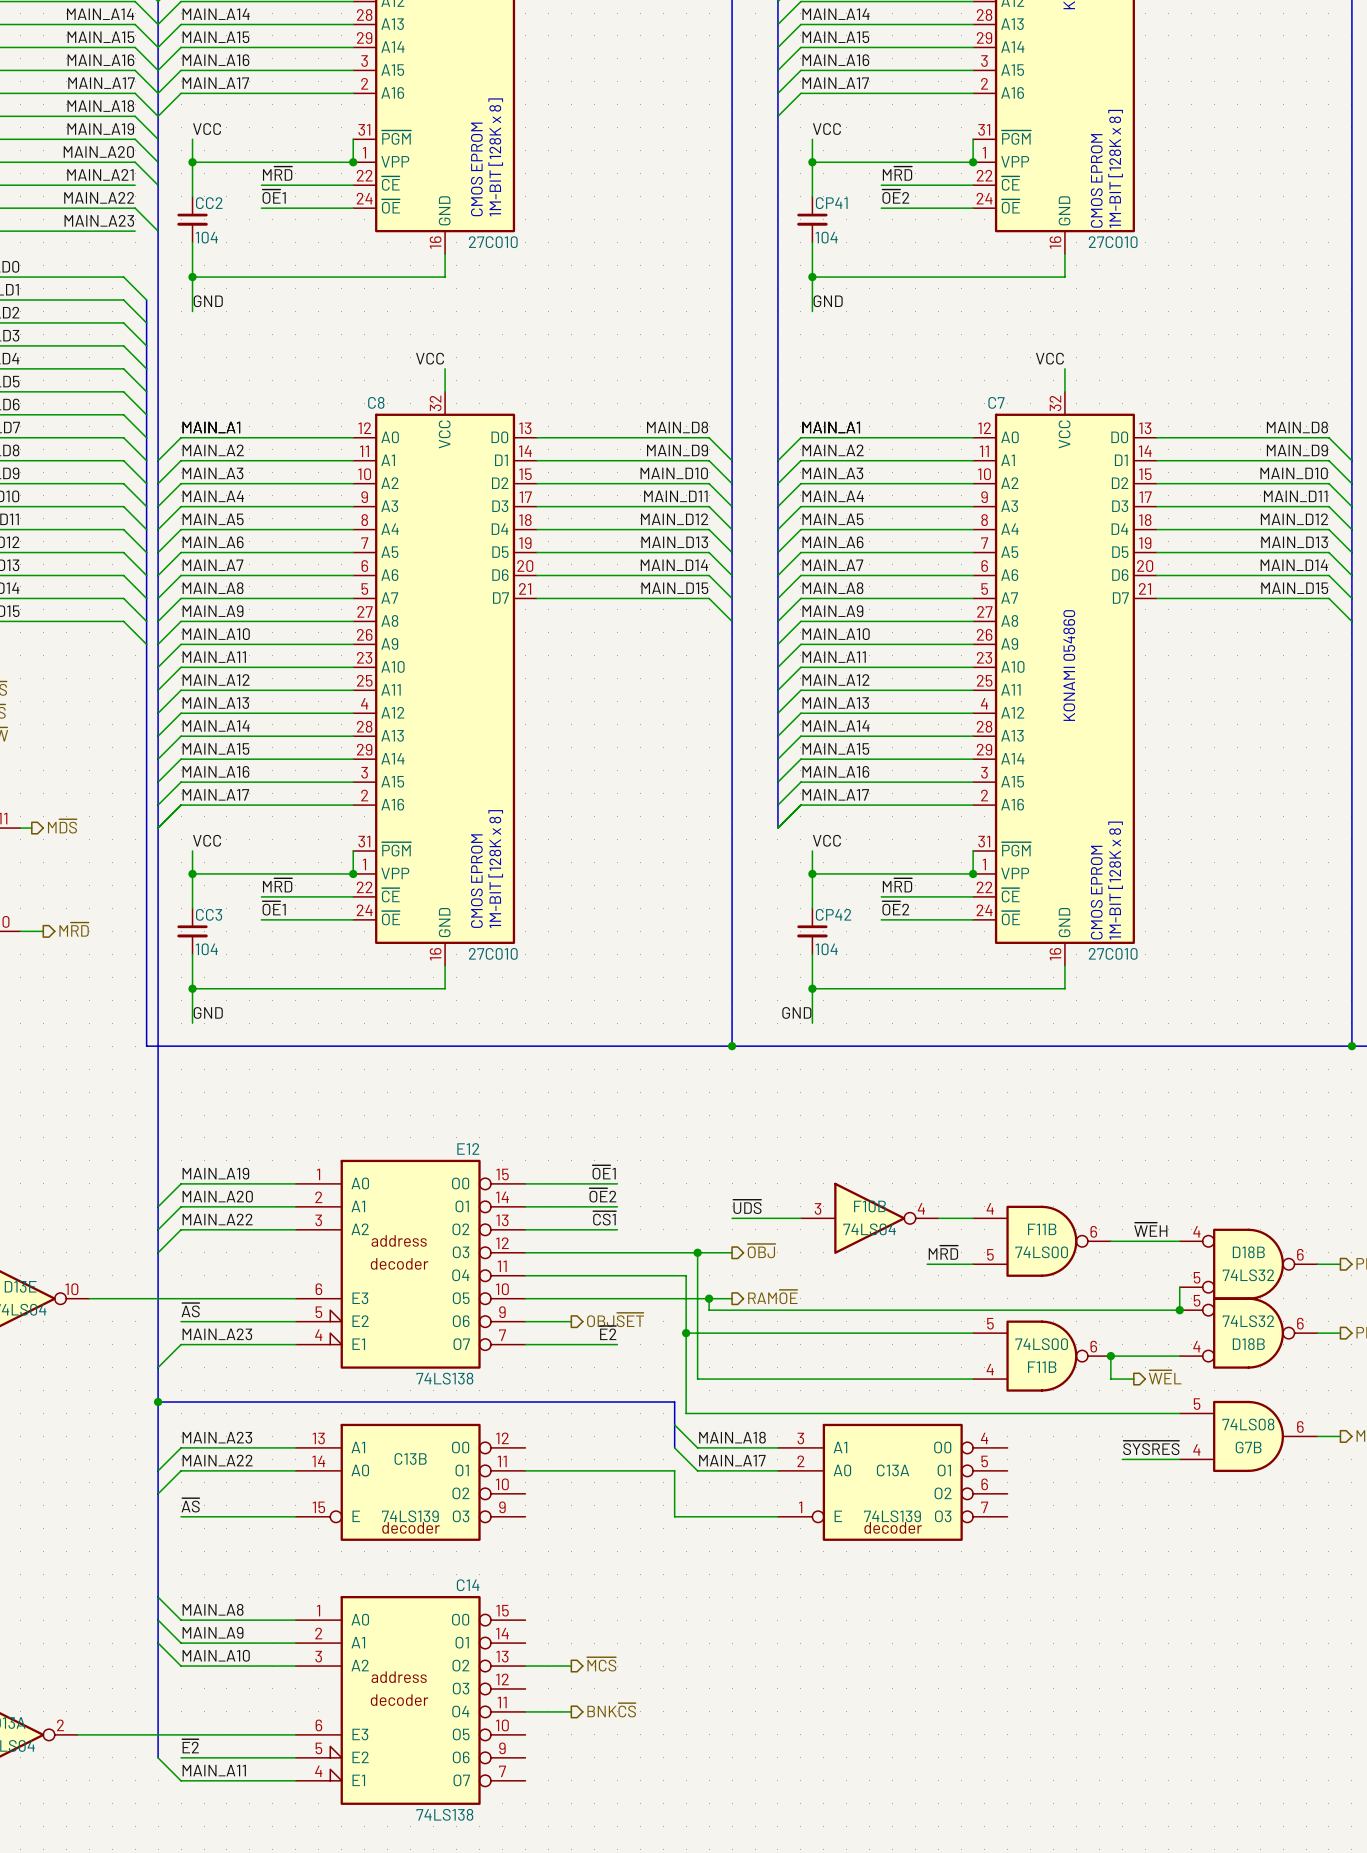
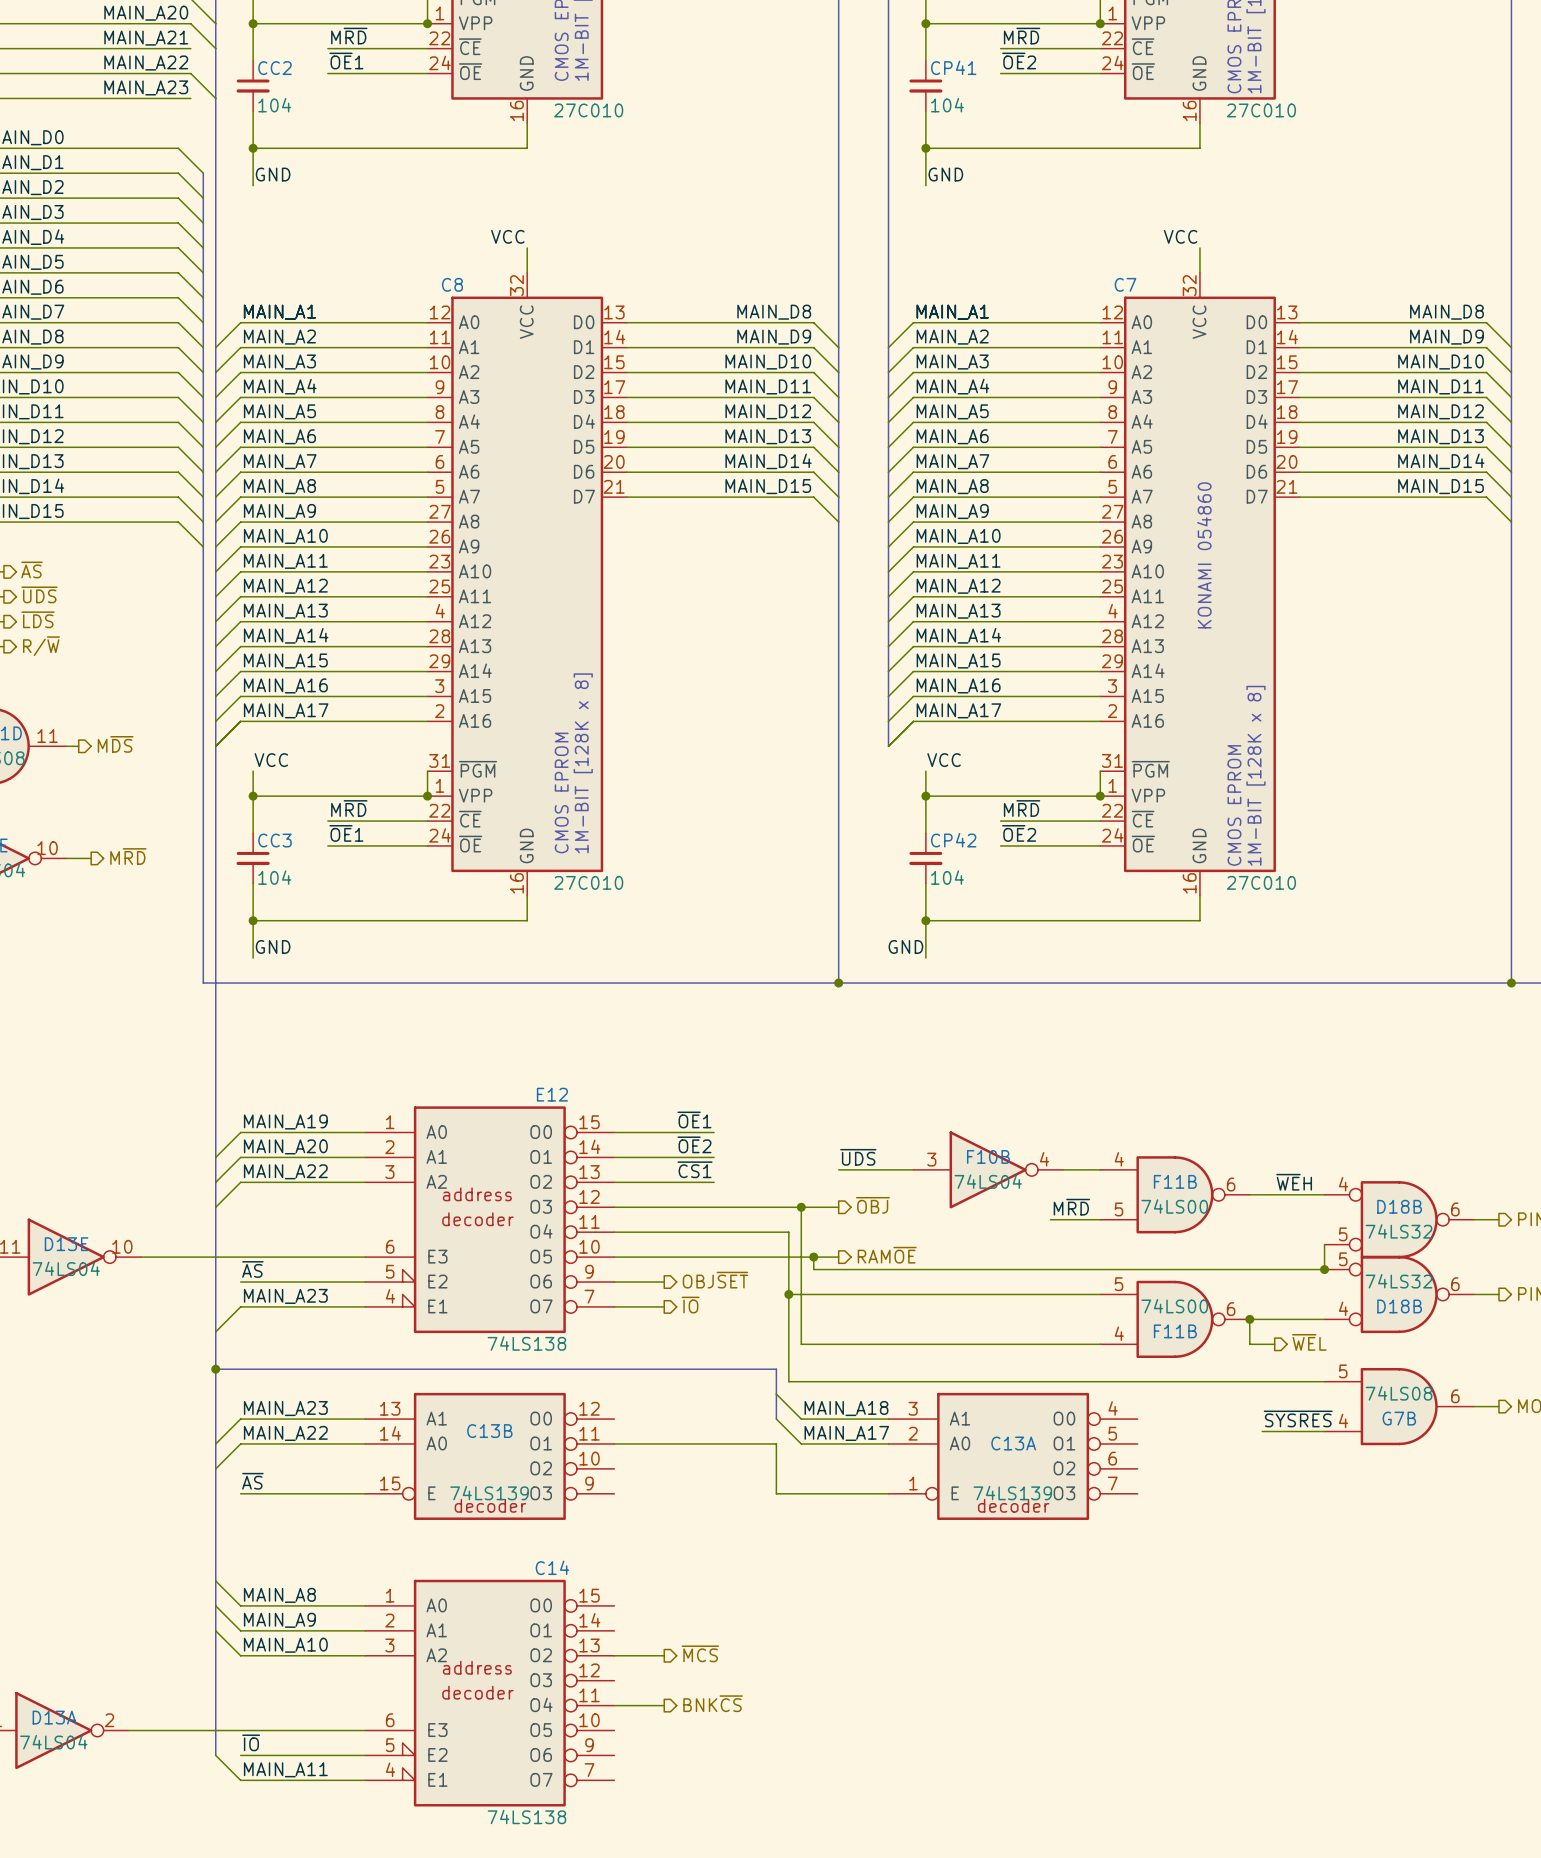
label: ~{E2} (608, 1333) -> none
hierarchical label: none -> ~{IO} (690, 1305)
wire: (571, 1344) (617, 1344) -> none
label: ~{E2} (190, 1746) -> ~{IO} (251, 1742)

